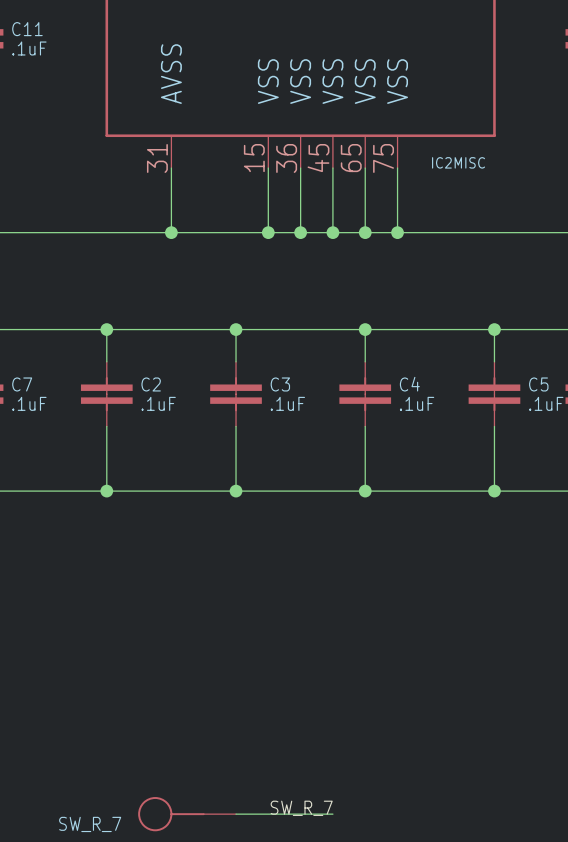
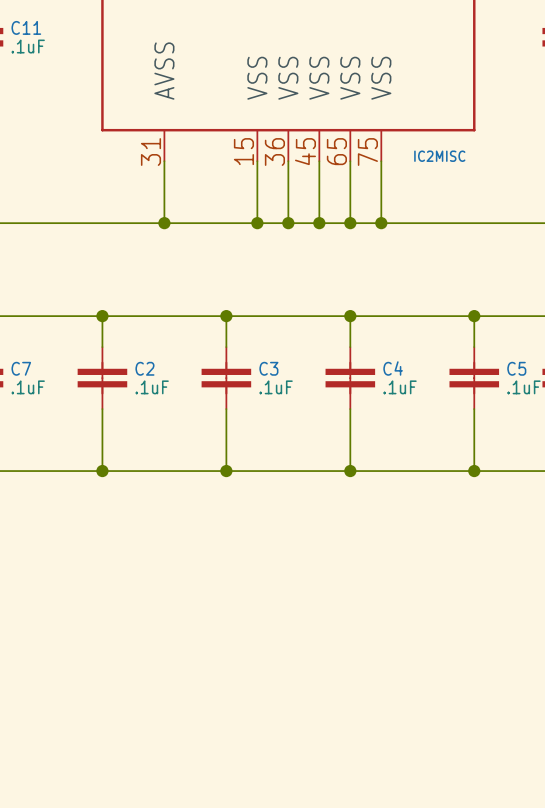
label: SW_R_7 (301, 808) -> none
SW_R_7: (187, 814) -> none
wire: (236, 814) (332, 814) -> none

